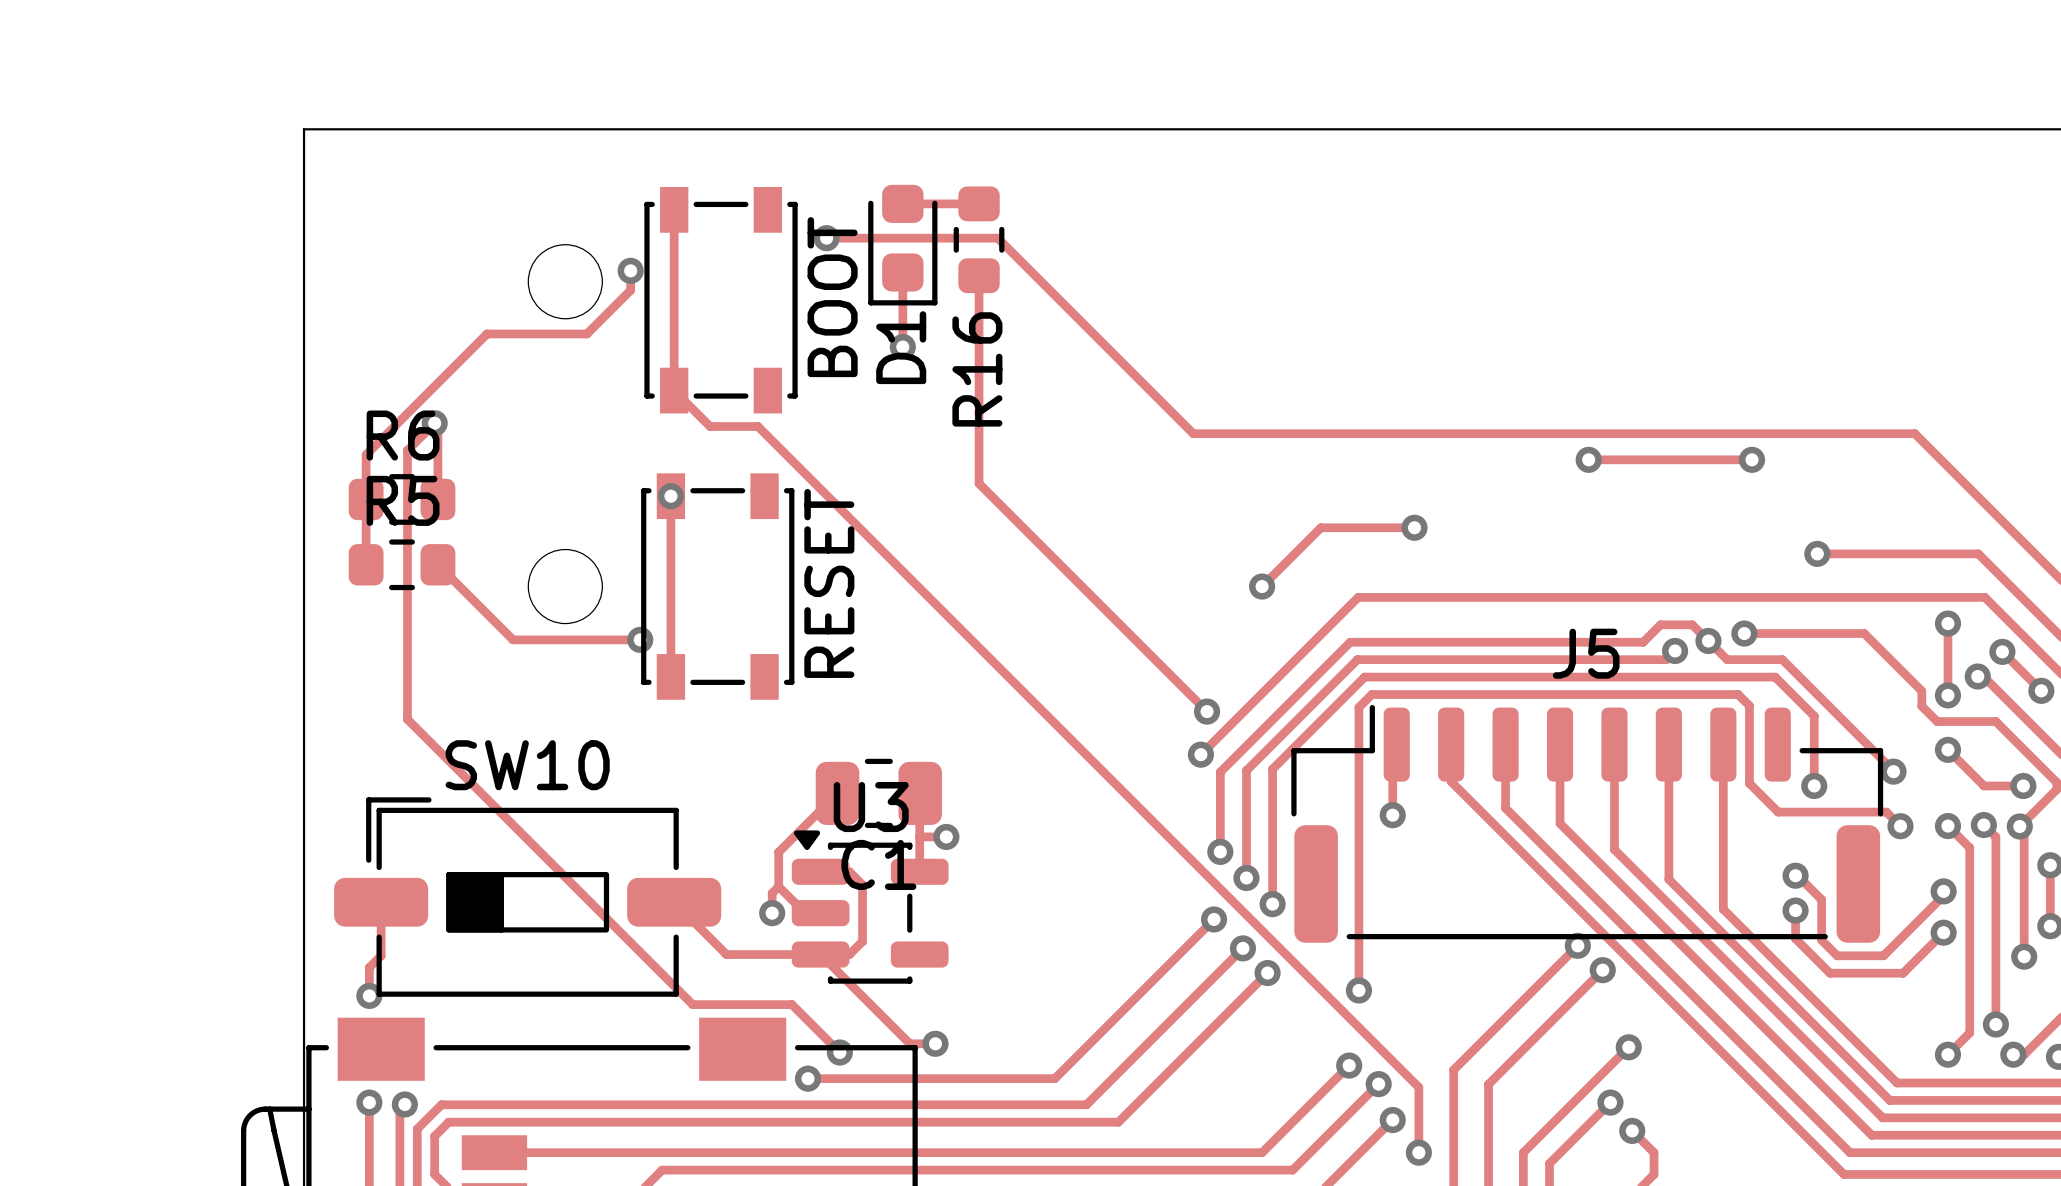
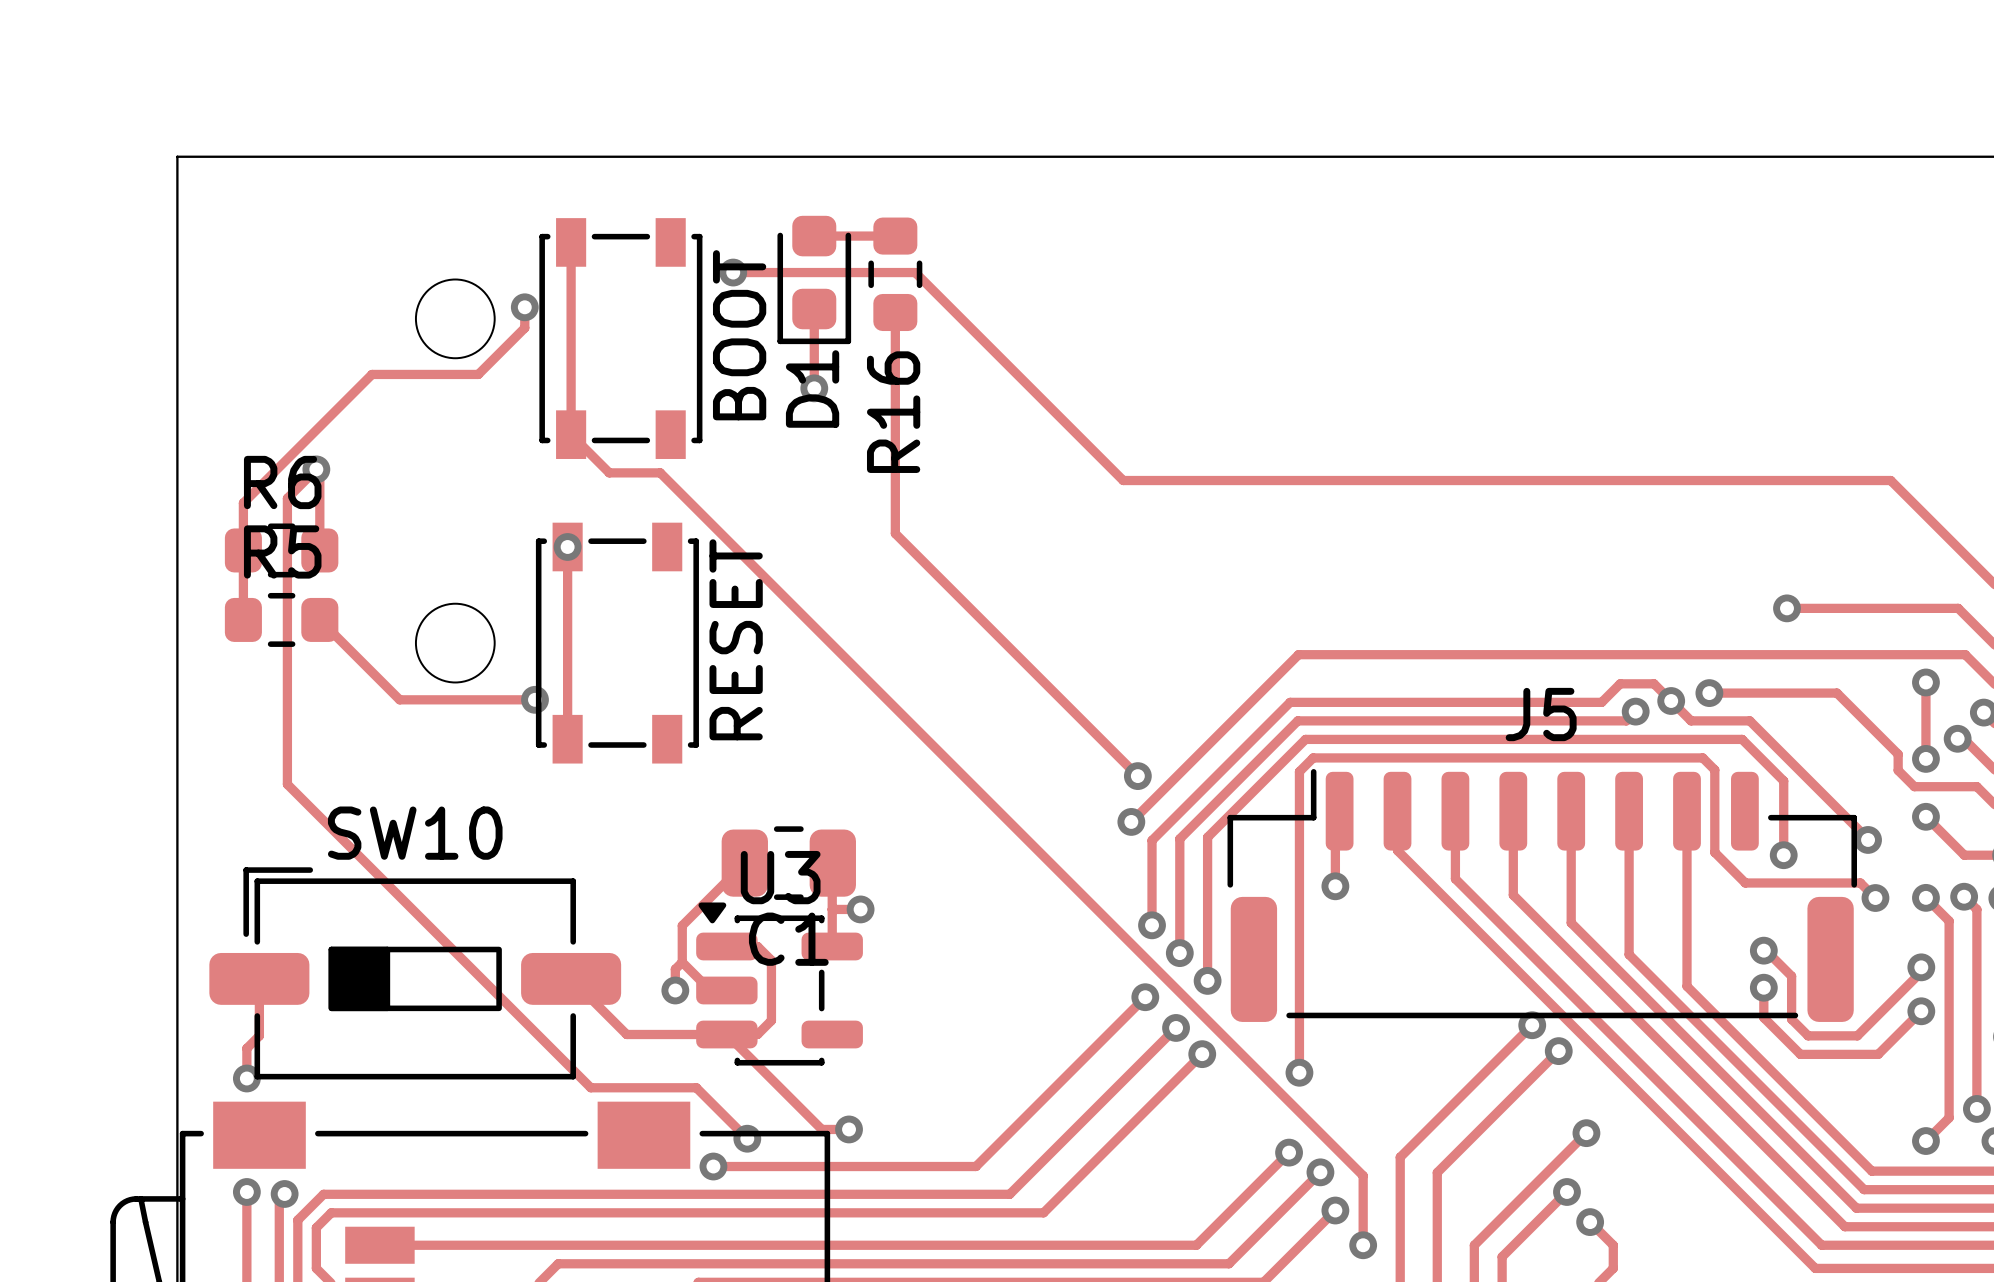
track: (1588, 459) (1752, 459) -> none
via: (1588, 459) -> none
via: (1752, 459) -> none
track: (1414, 527) (1320, 527) (1262, 586) -> none
via: (1414, 527) -> none
via: (1262, 586) -> none

